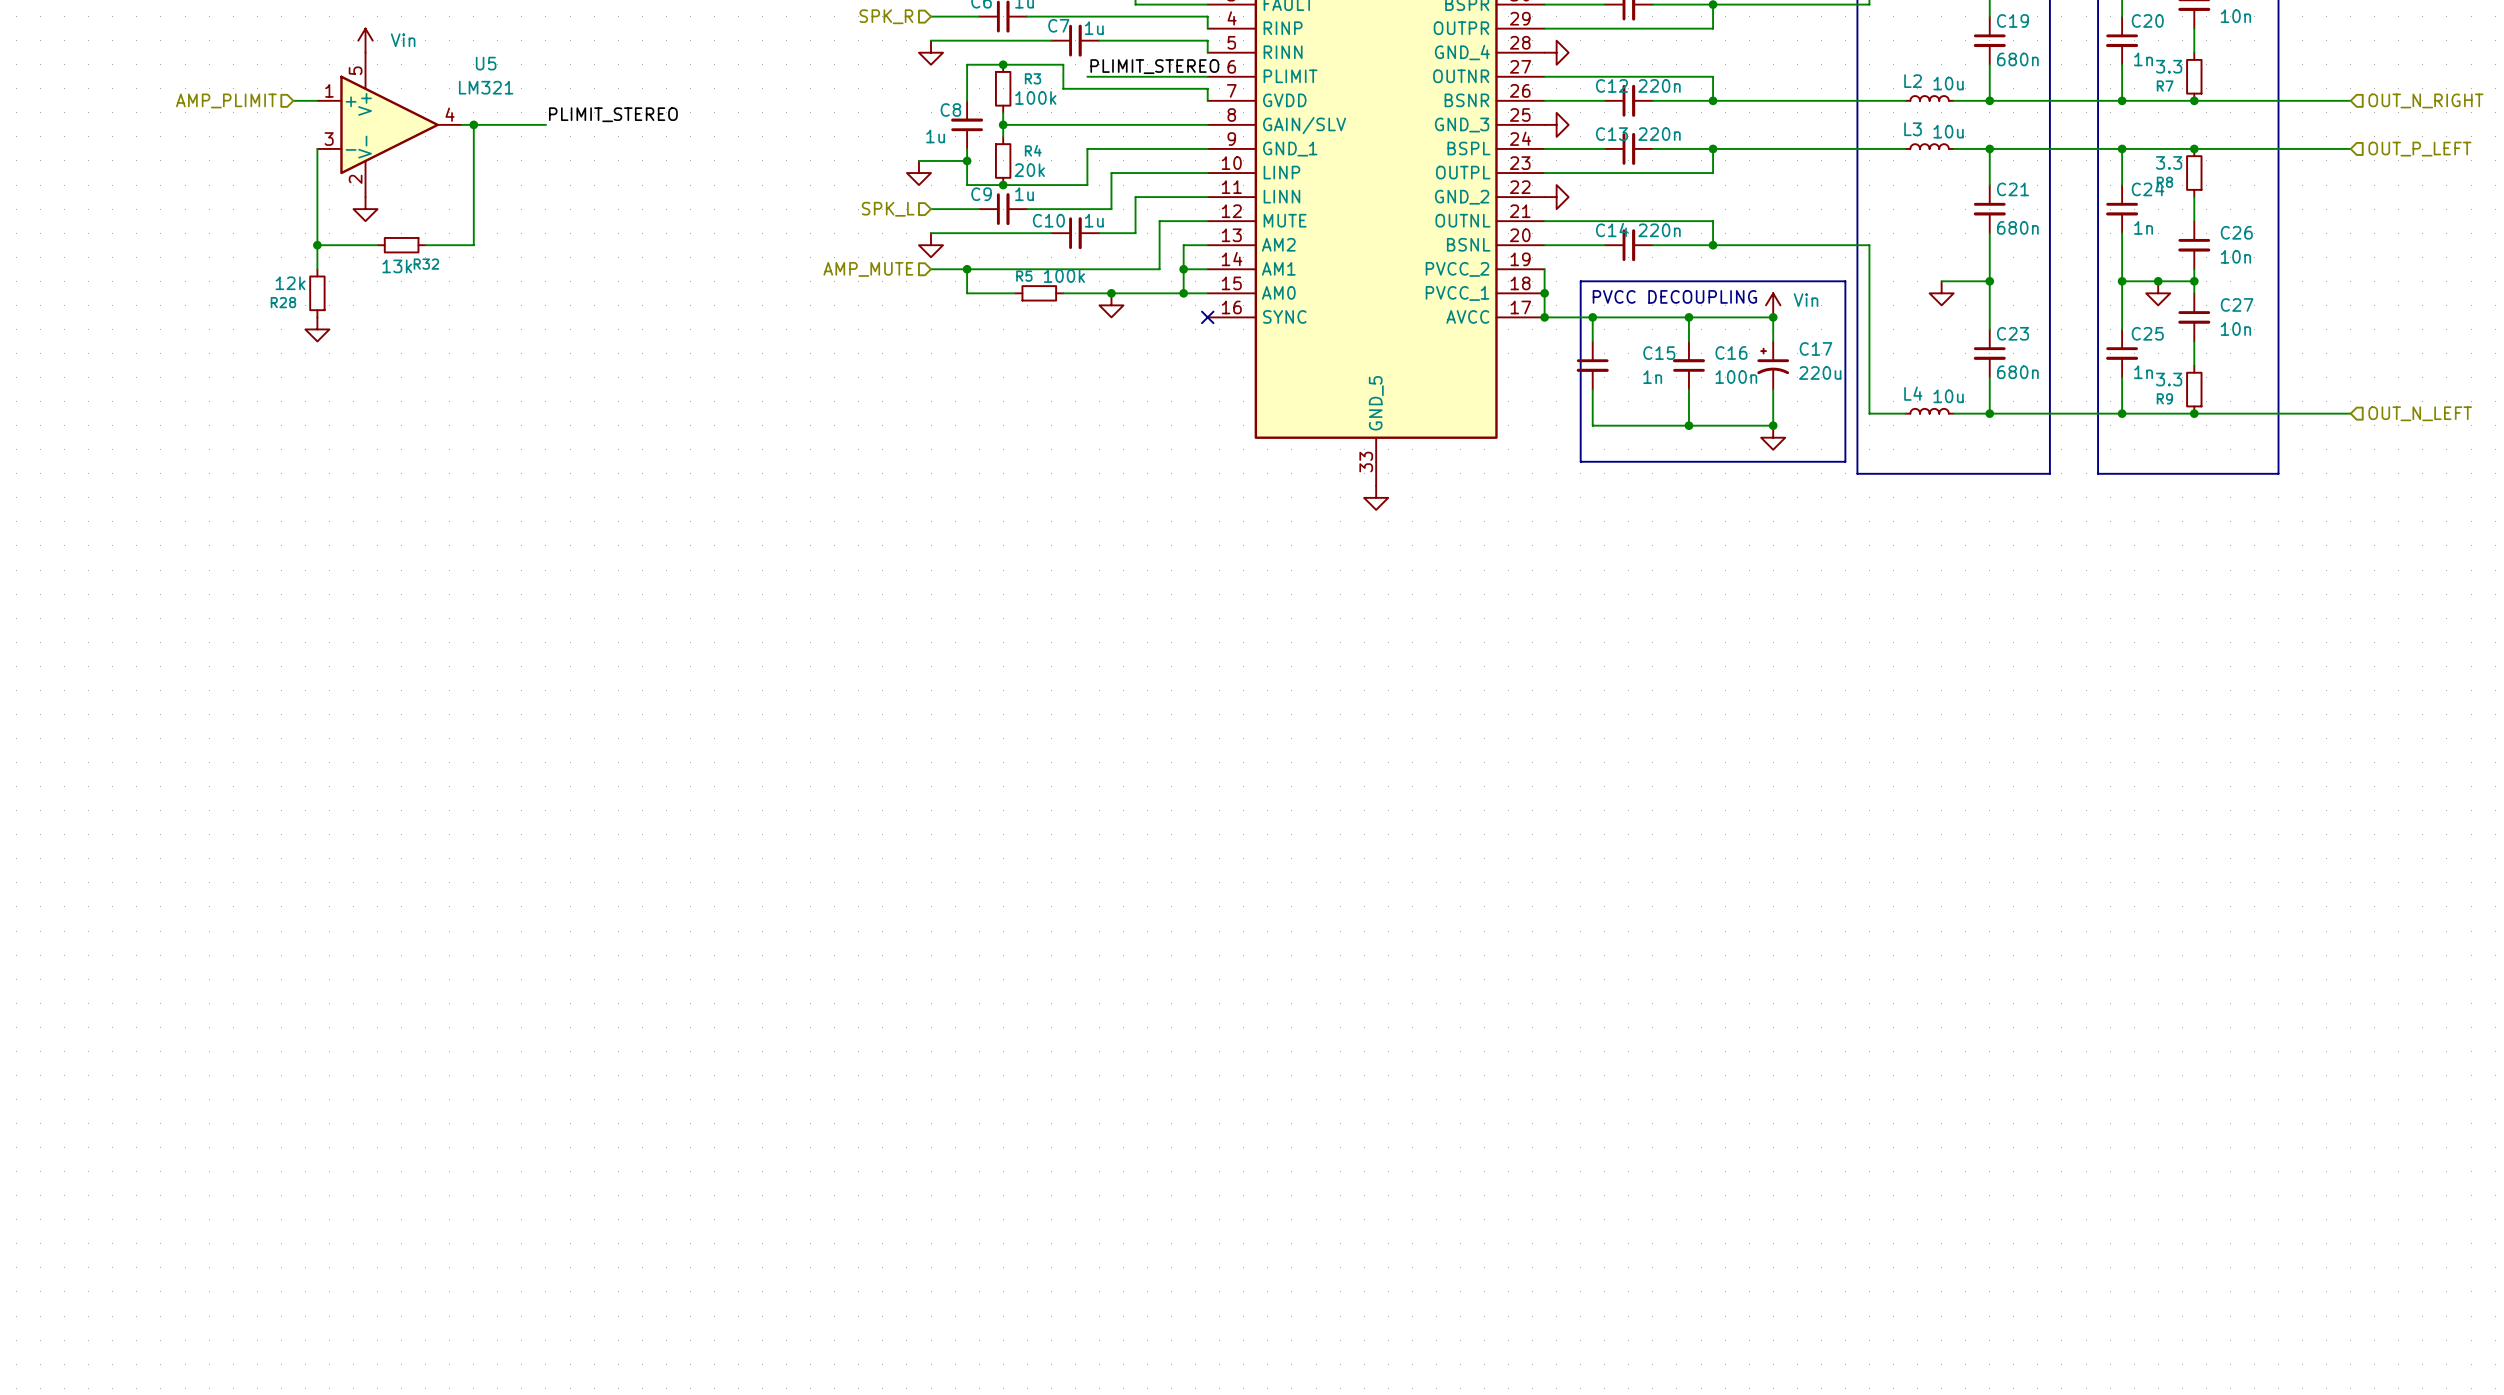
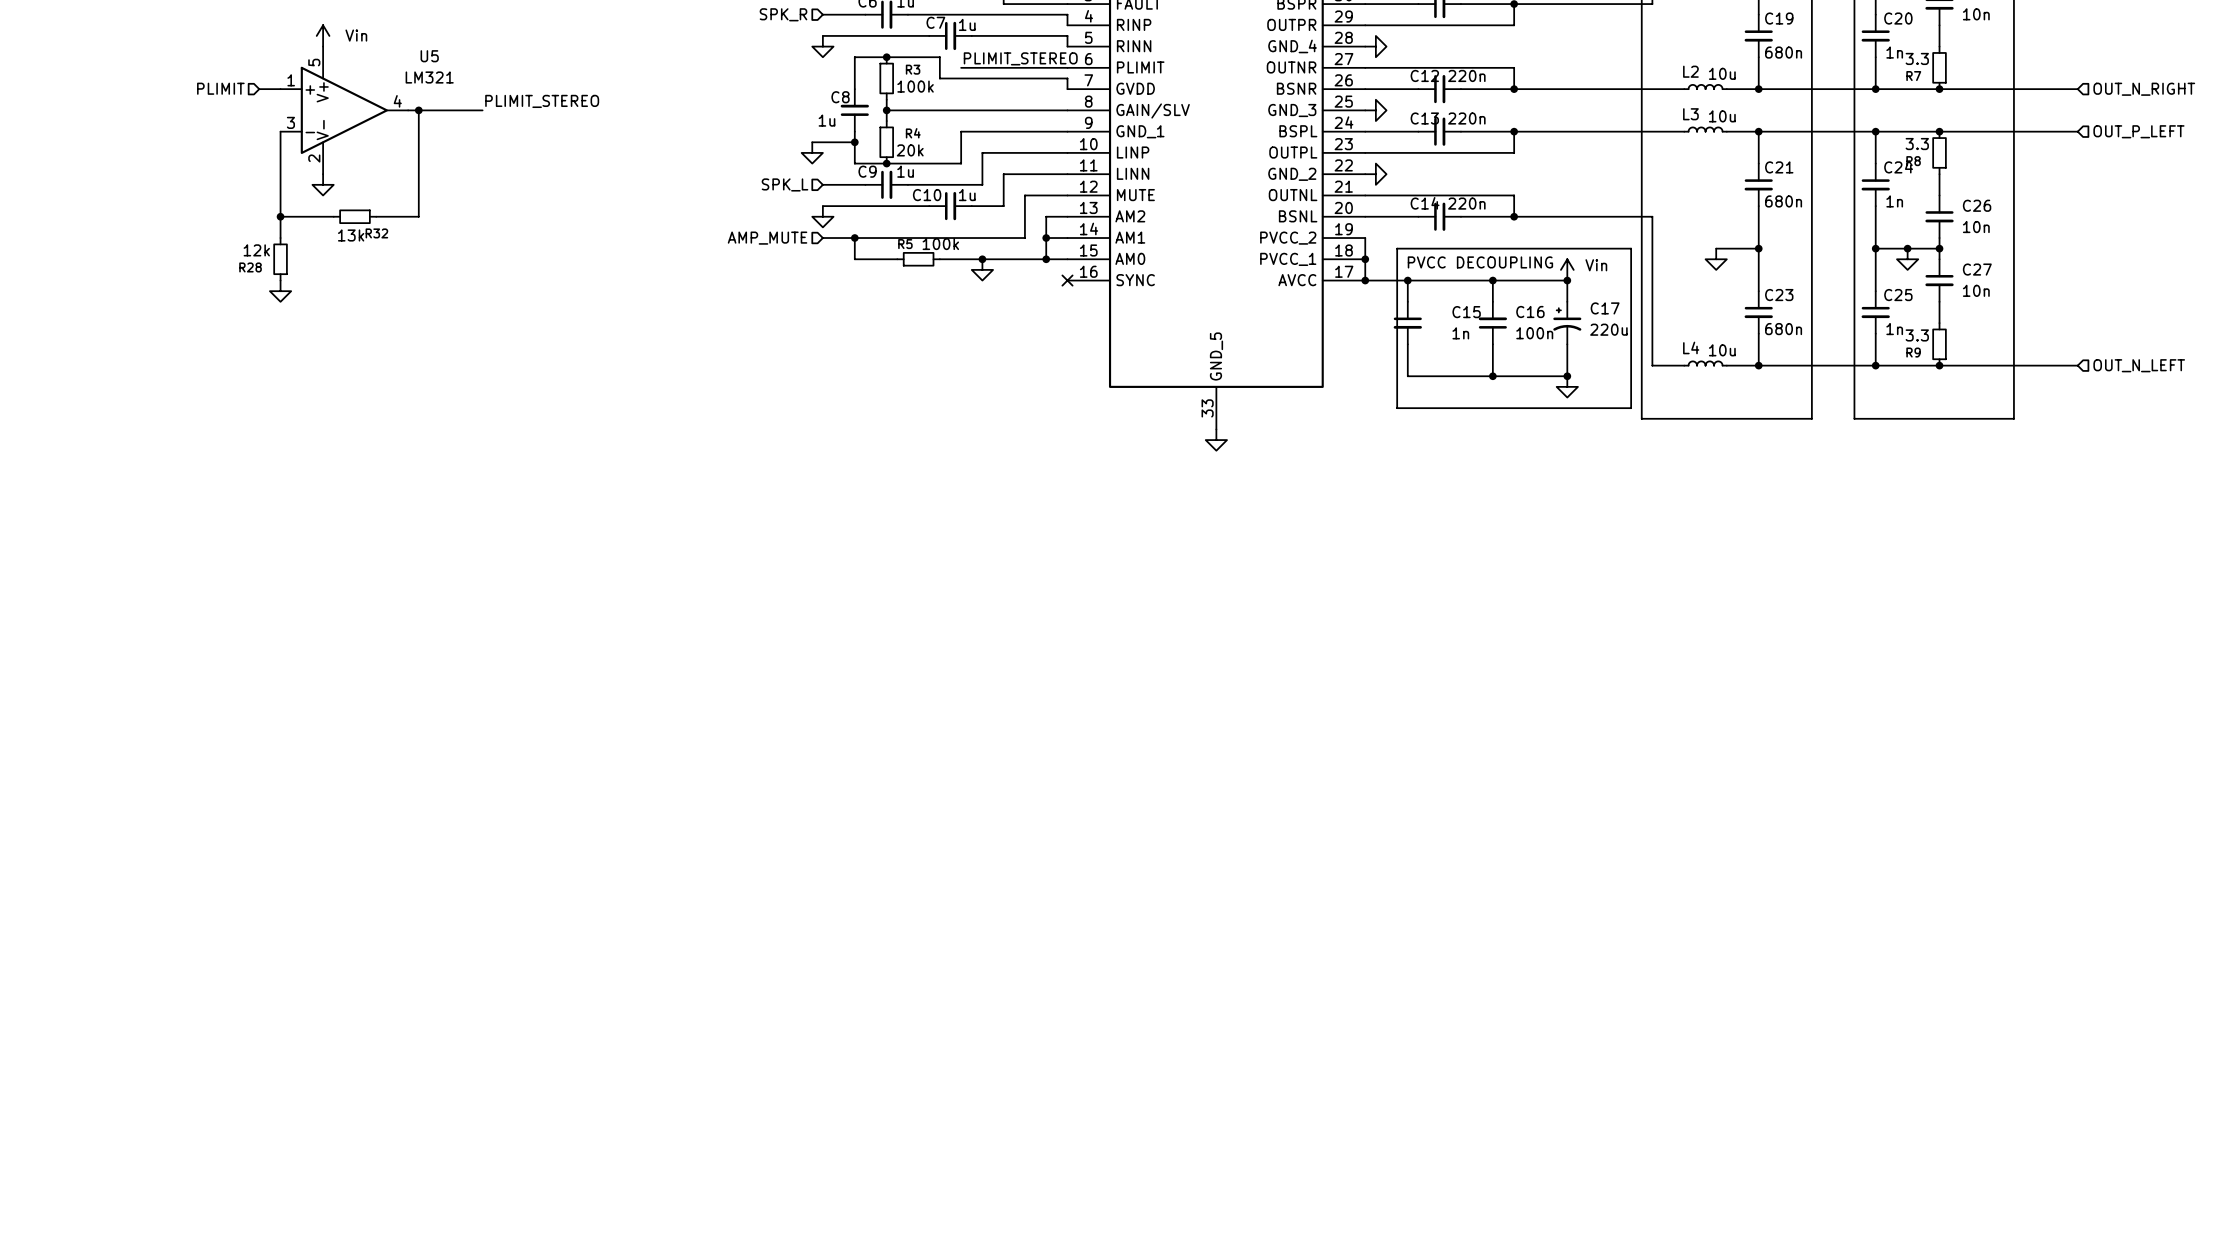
hierarchical label: AMP_PLIMIT (226, 100) -> PLIMIT (220, 88)

